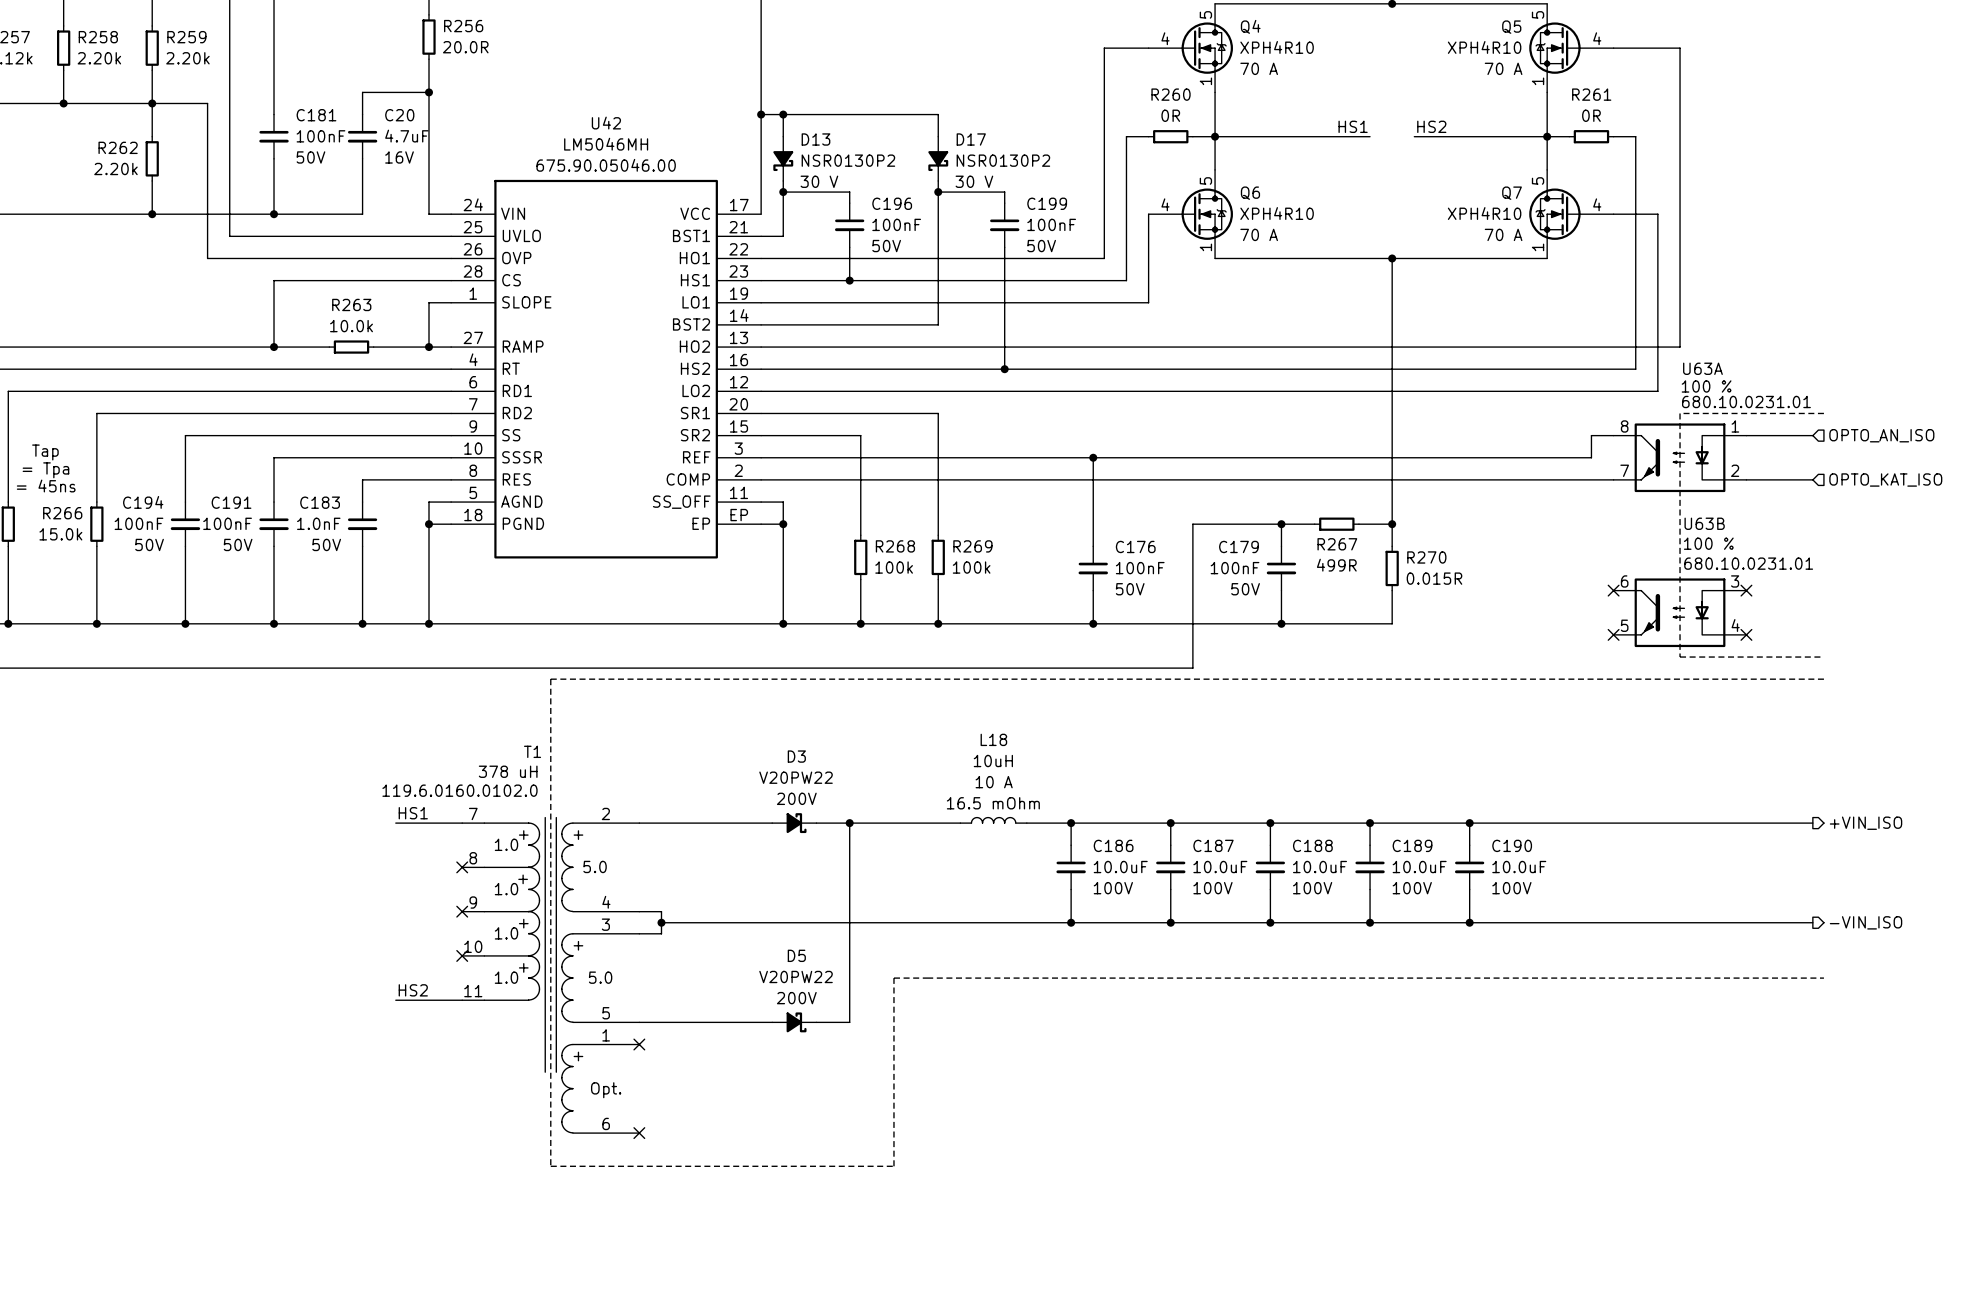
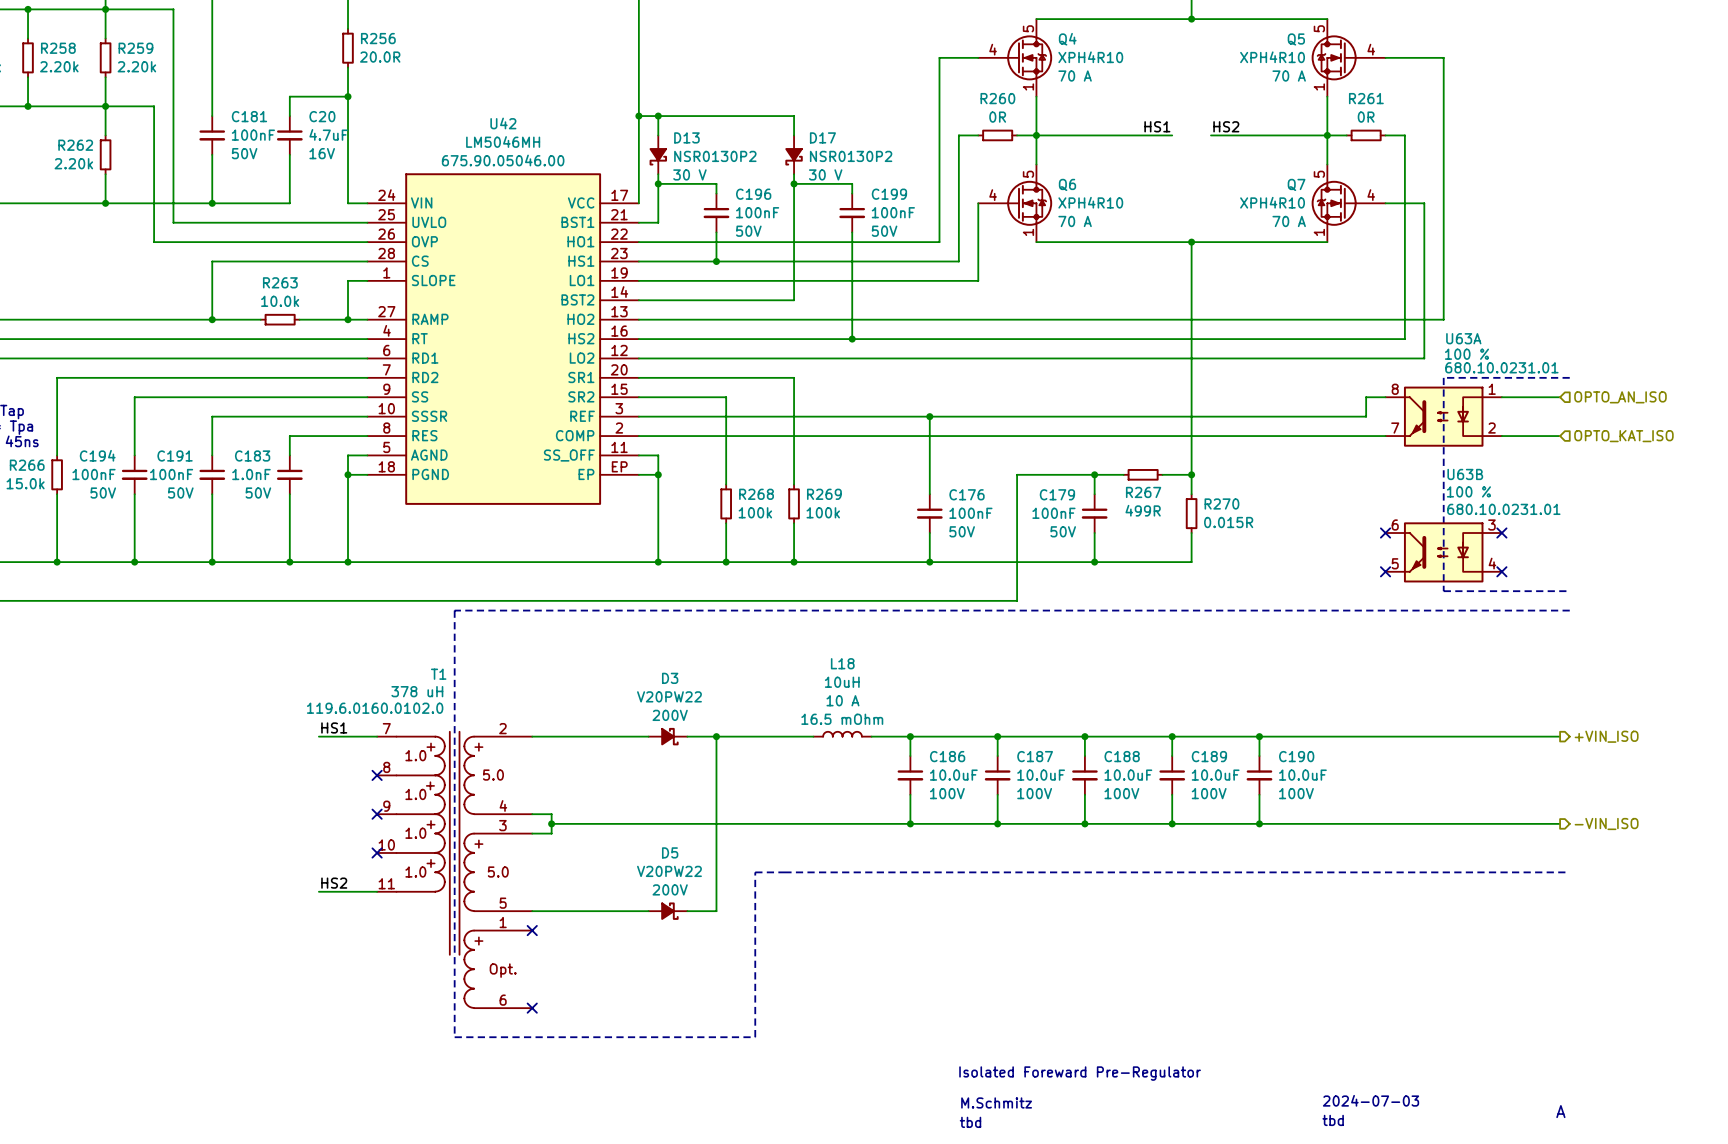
text: none -> Isolated Foreward Pre-Regulator (1080, 1073)
text: none -> 2024-07-03 (1371, 1100)
text: none -> M.Schmitz (996, 1102)
text: none -> A (1560, 1111)
text: none -> tbd (1333, 1120)
text: none -> tbd (970, 1122)

